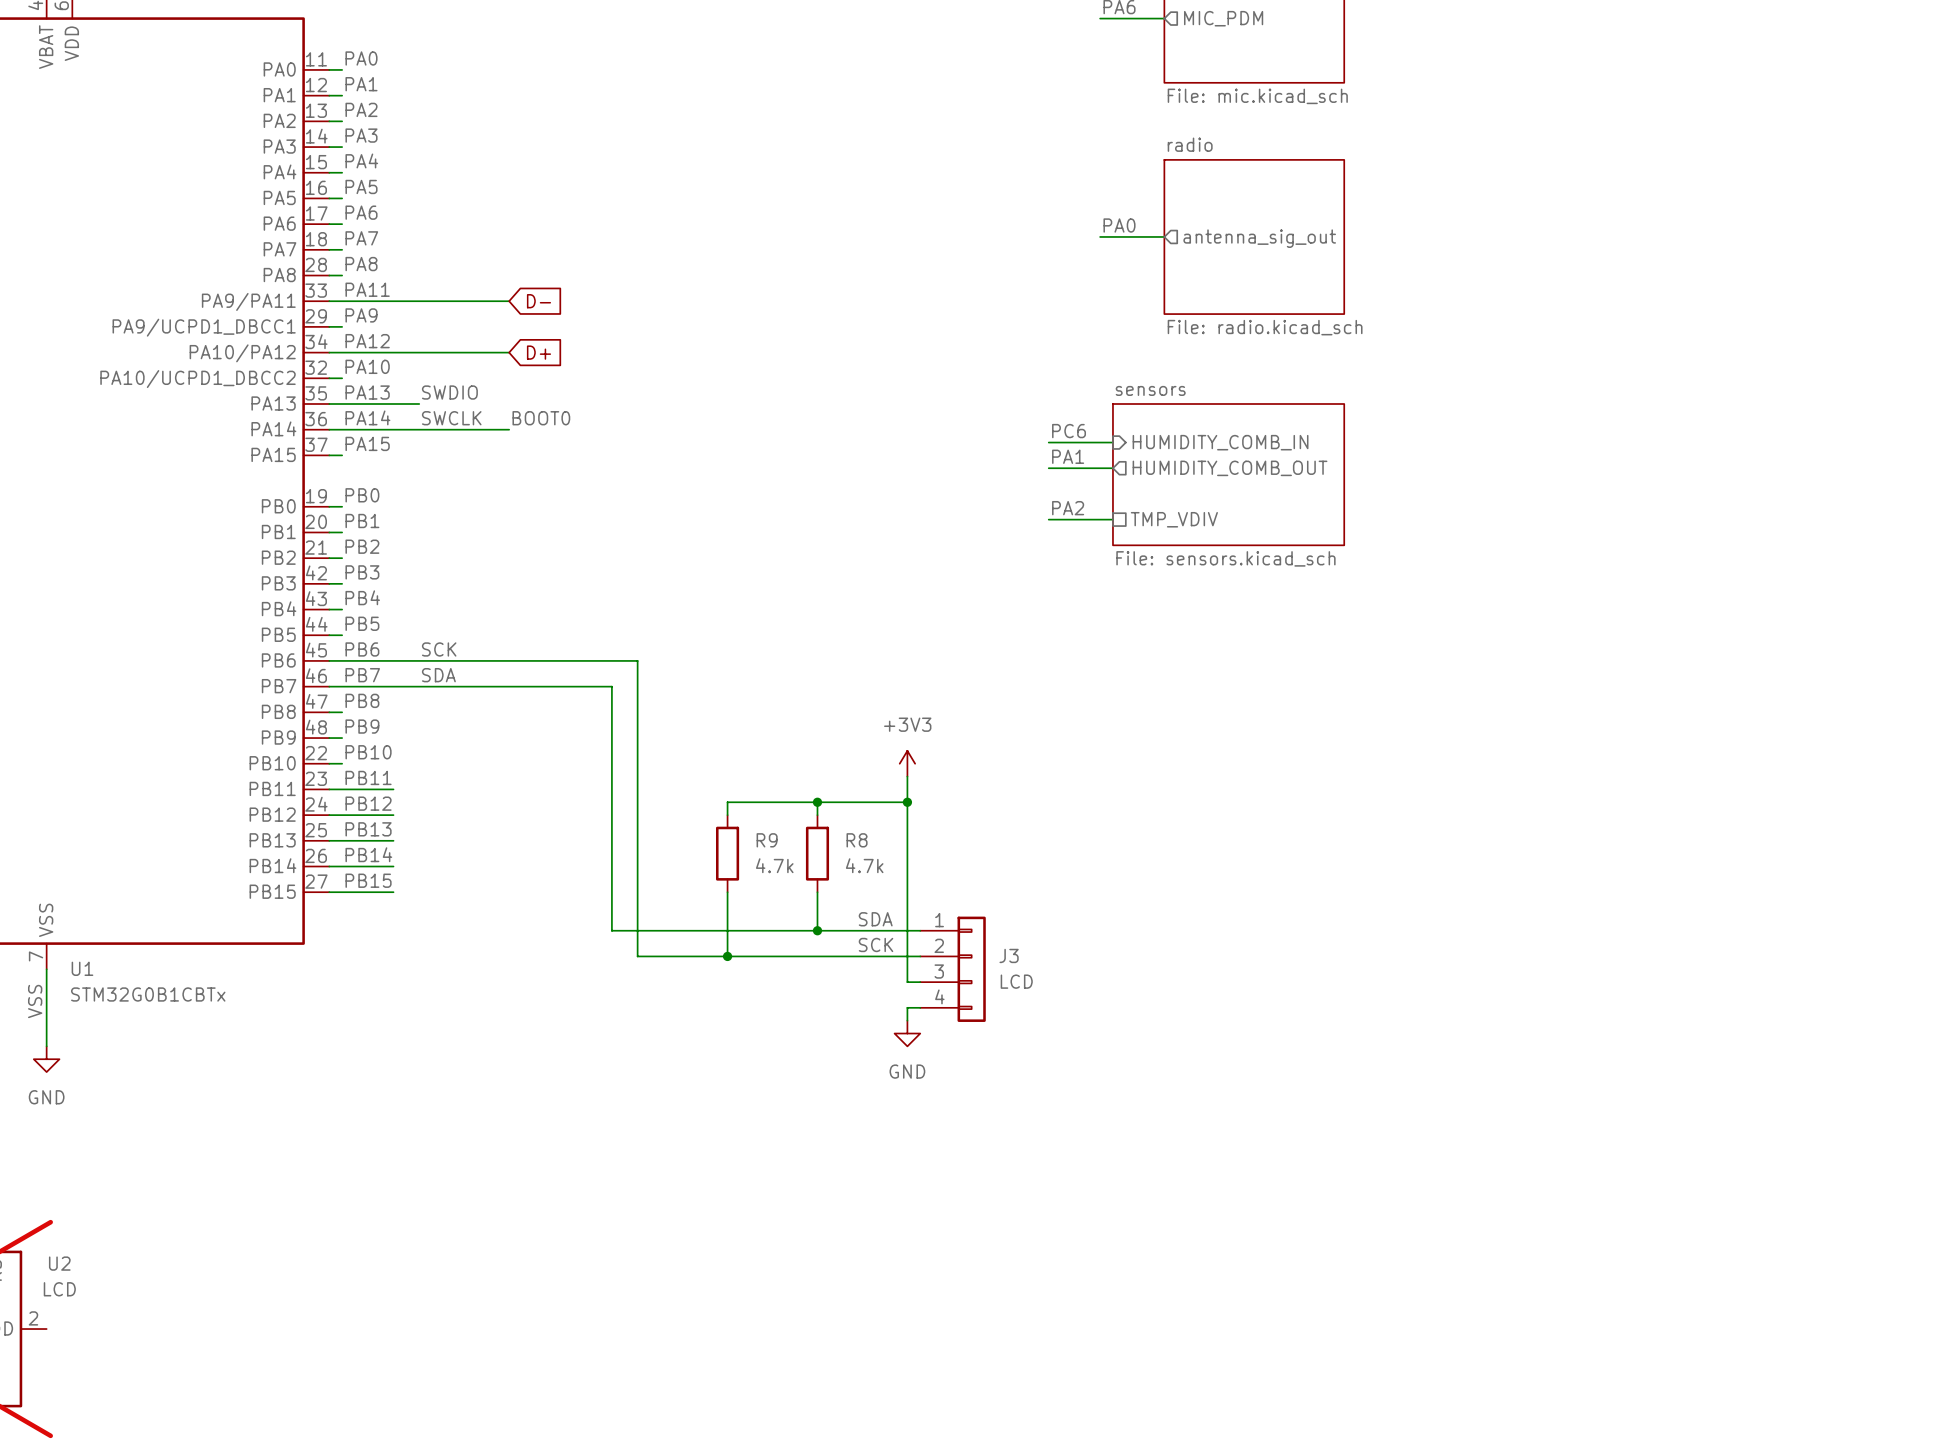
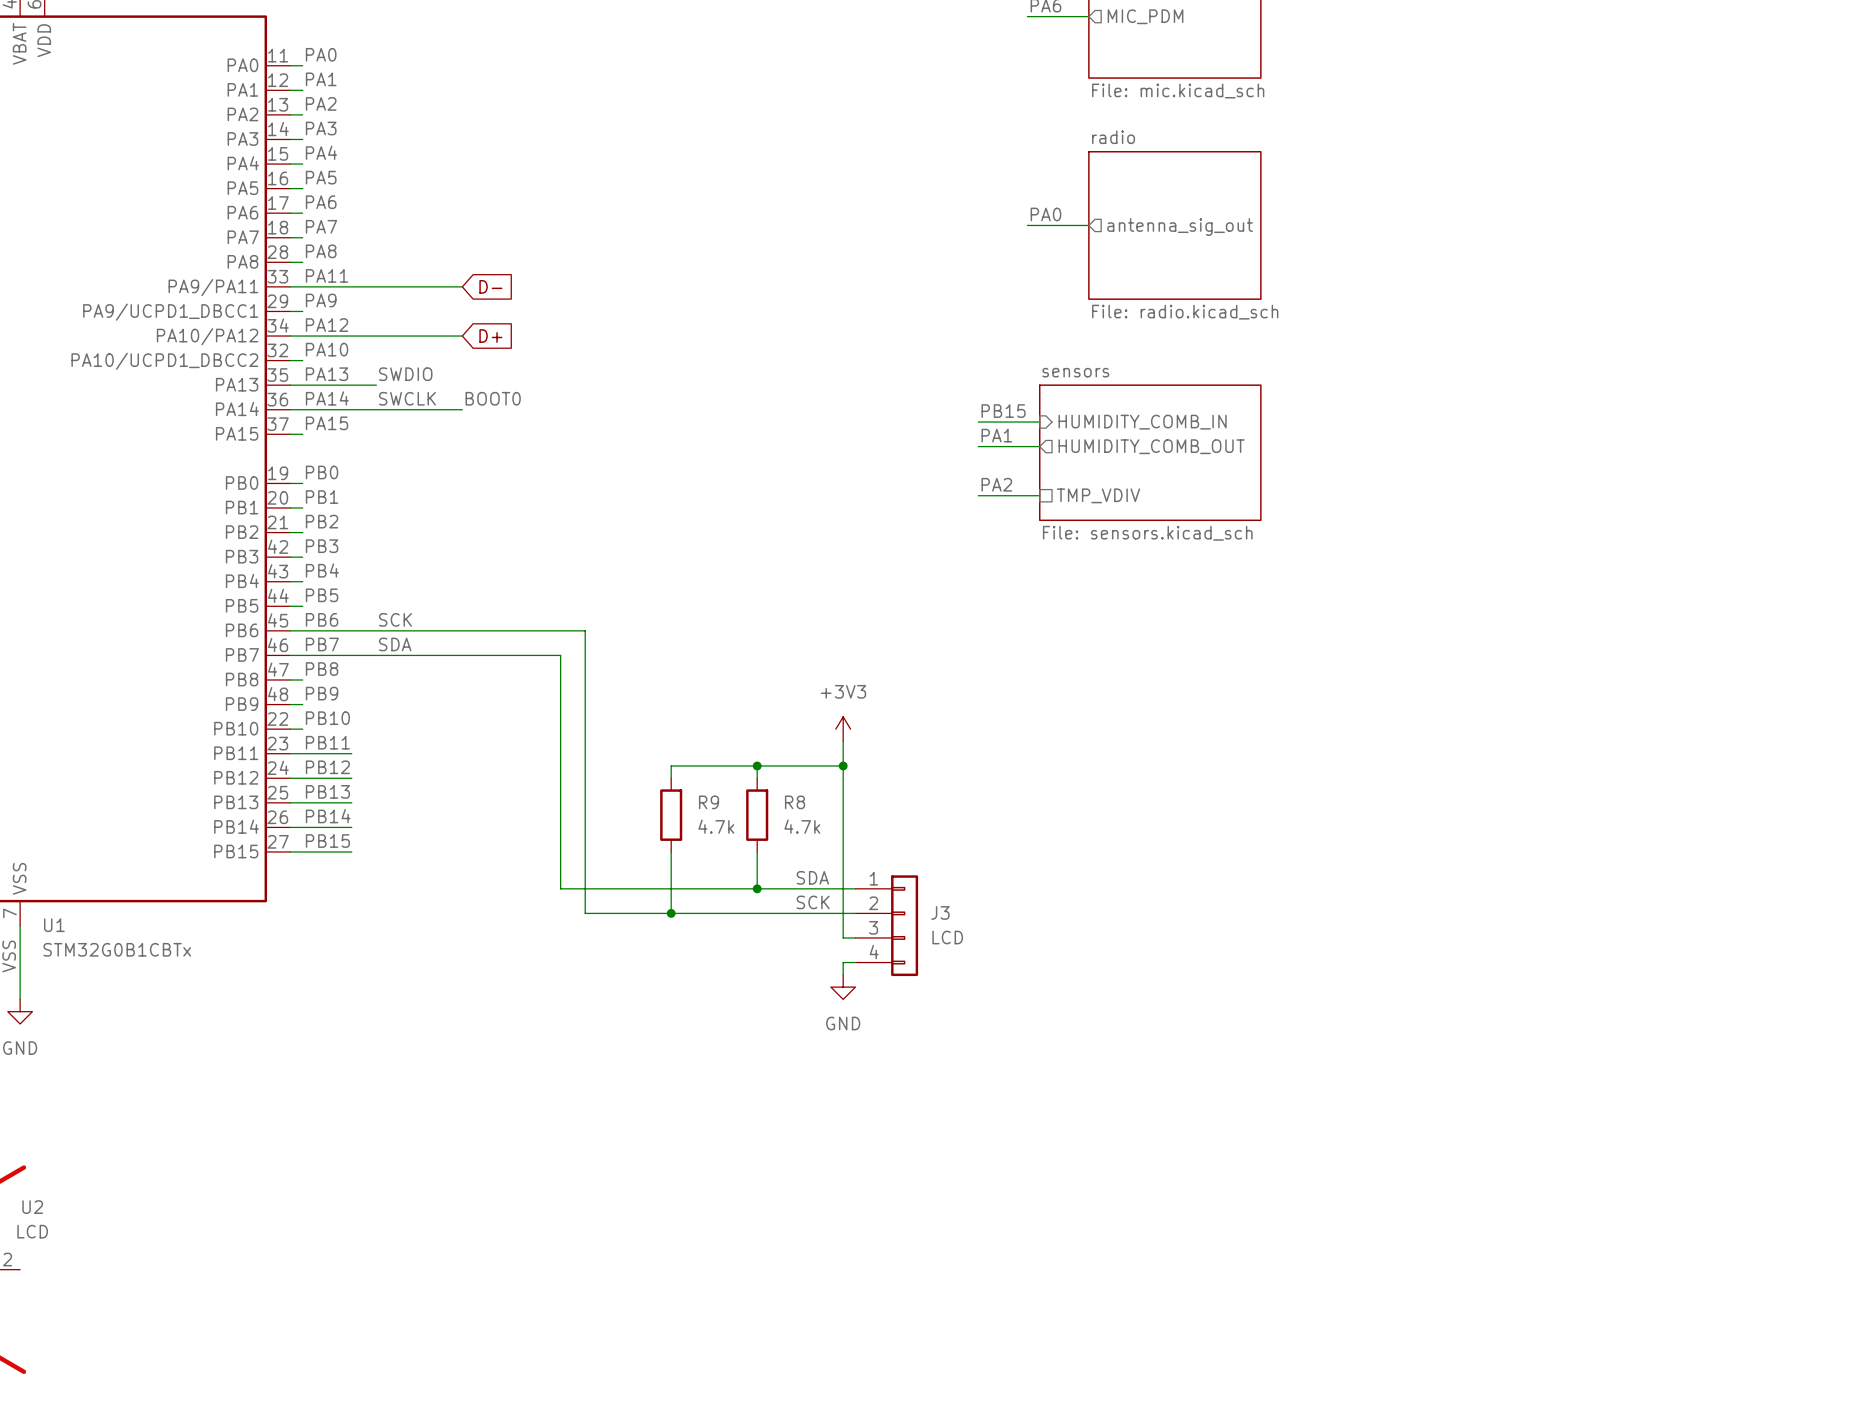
label: PC6 (1069, 431) -> PB15 (1003, 411)

